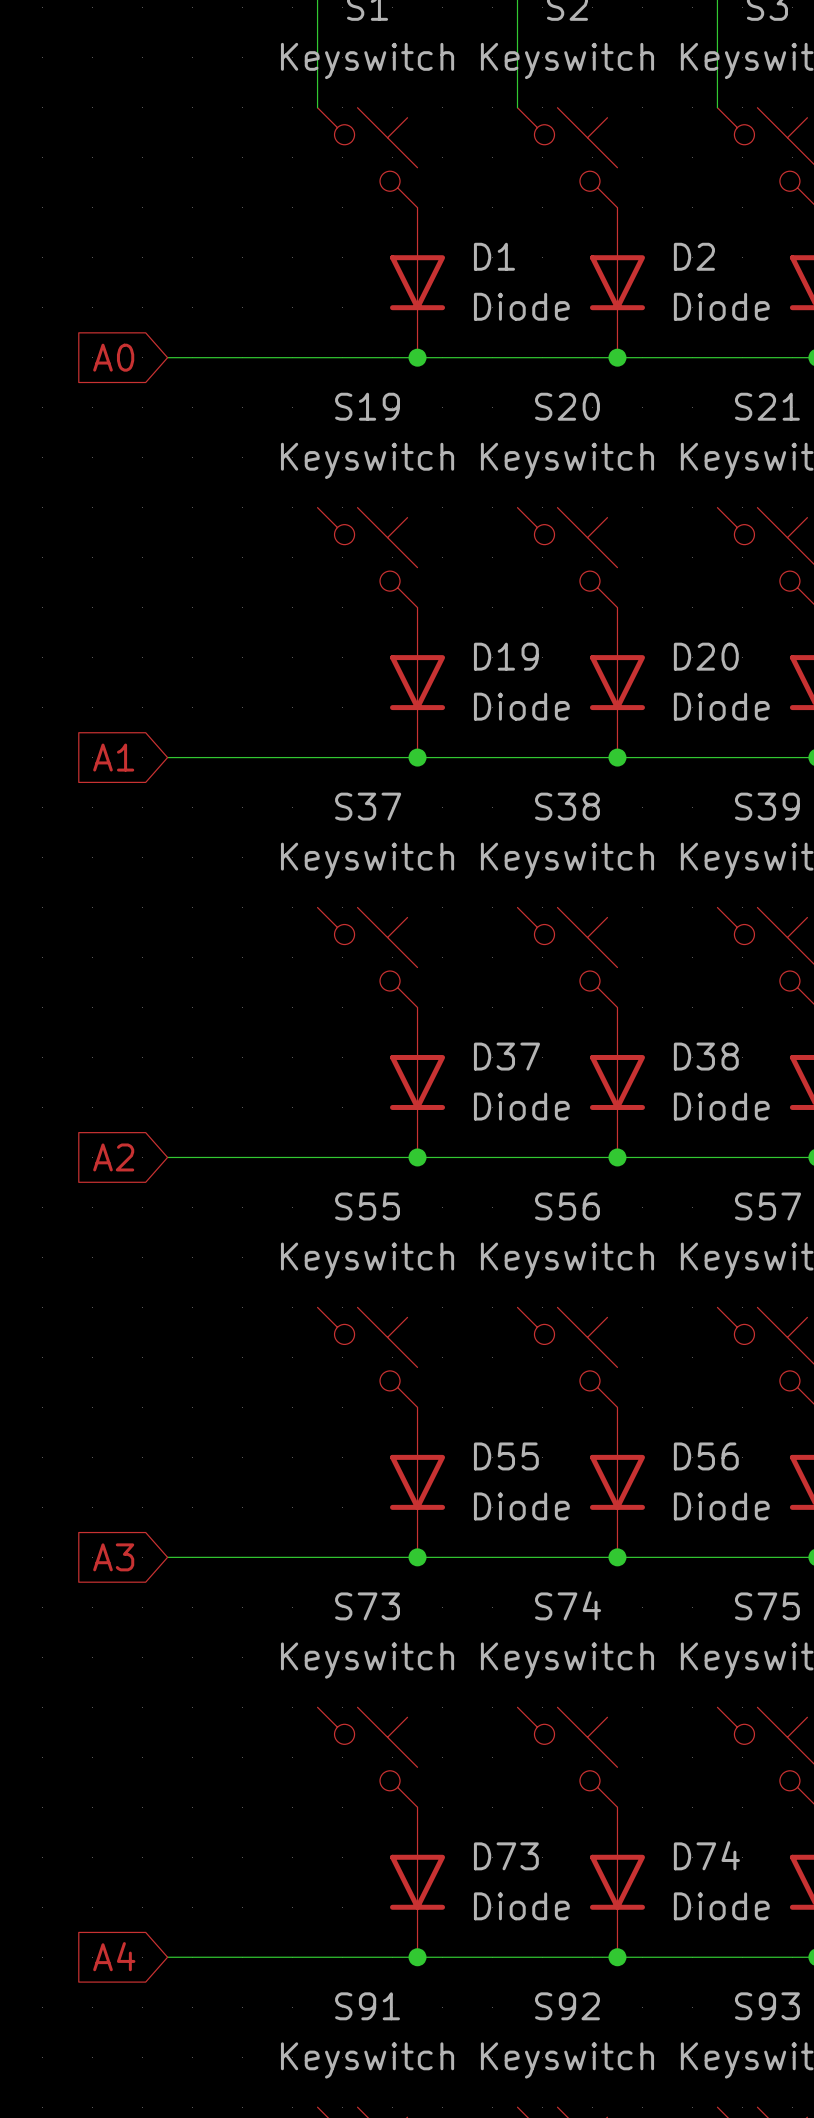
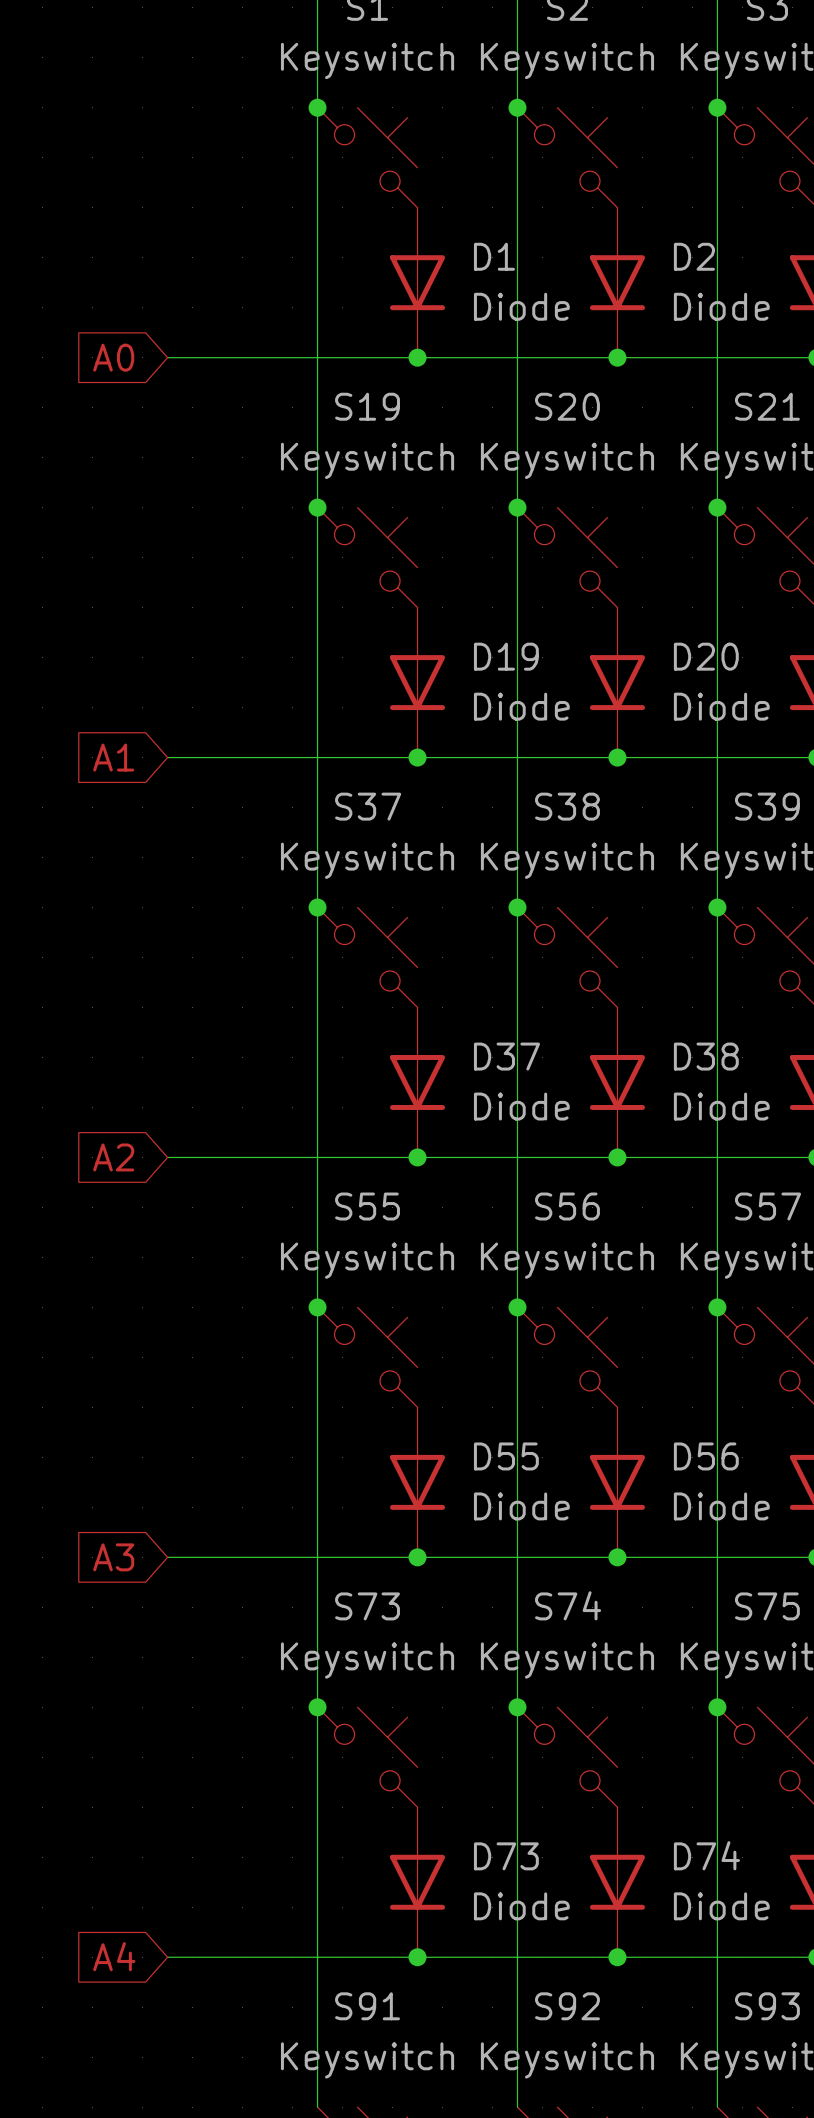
wire: none -> (317, 107) (317, 2107)
junction: none -> (317, 107)
wire: none -> (517, 107) (517, 2107)
junction: none -> (517, 107)
wire: none -> (717, 107) (717, 2107)
junction: none -> (717, 107)
junction: none -> (317, 507)
junction: none -> (517, 507)
junction: none -> (717, 507)
junction: none -> (317, 907)
junction: none -> (517, 907)
junction: none -> (717, 907)
junction: none -> (317, 1307)
junction: none -> (517, 1307)
junction: none -> (717, 1307)
junction: none -> (317, 1707)
junction: none -> (517, 1707)
junction: none -> (717, 1707)

